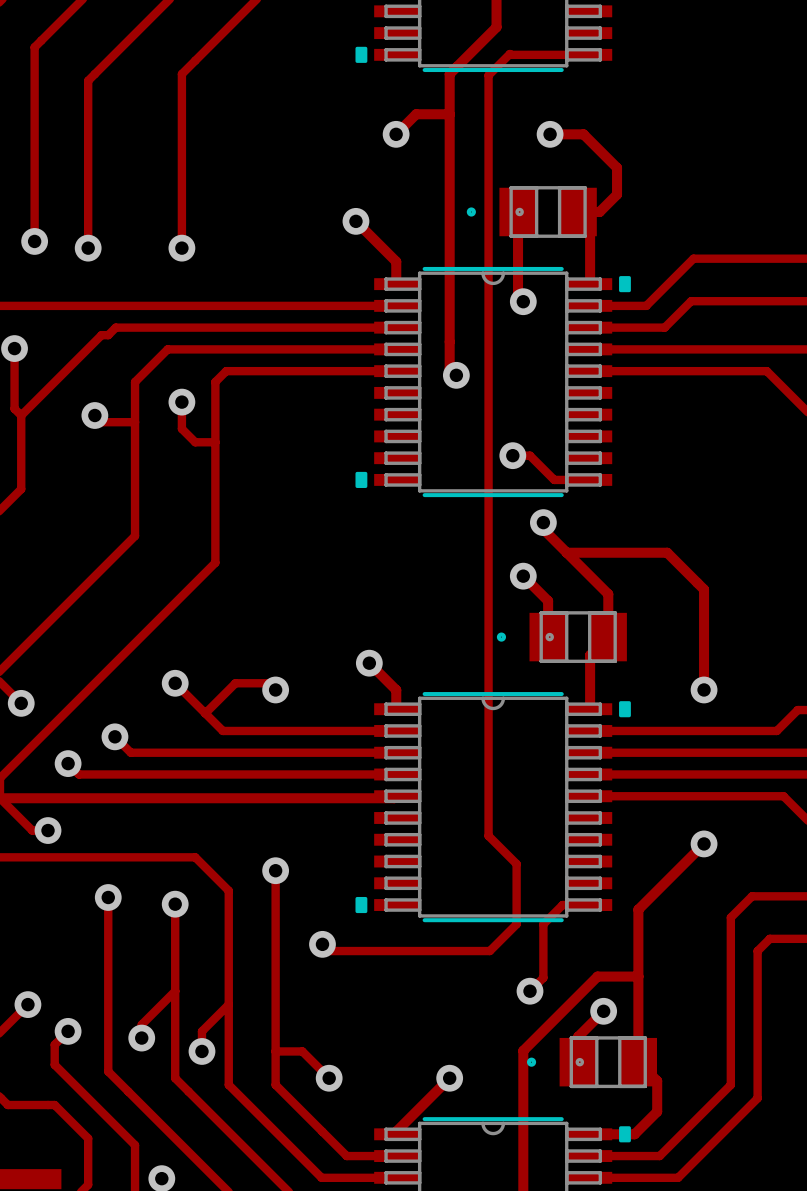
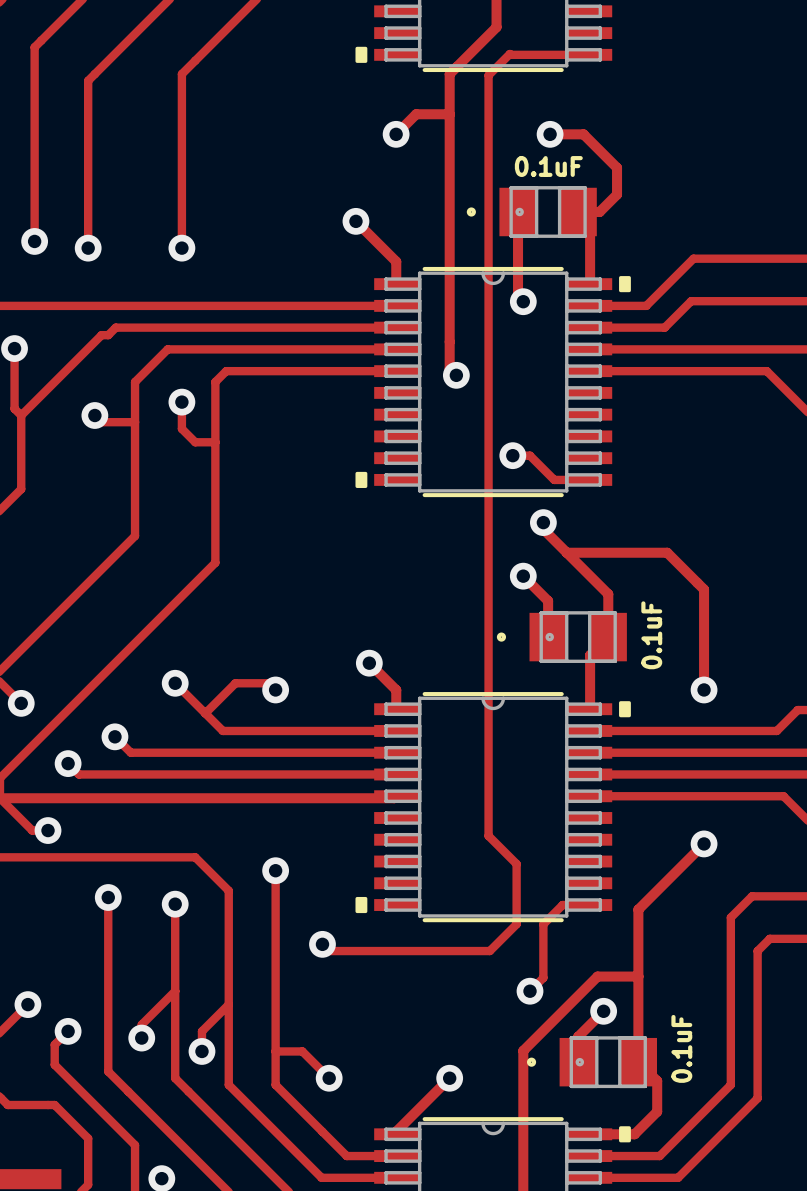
part value: none -> 0.1uF (548, 166)
part value: none -> 0.1uF (651, 635)
part value: none -> 0.1uF (681, 1048)

